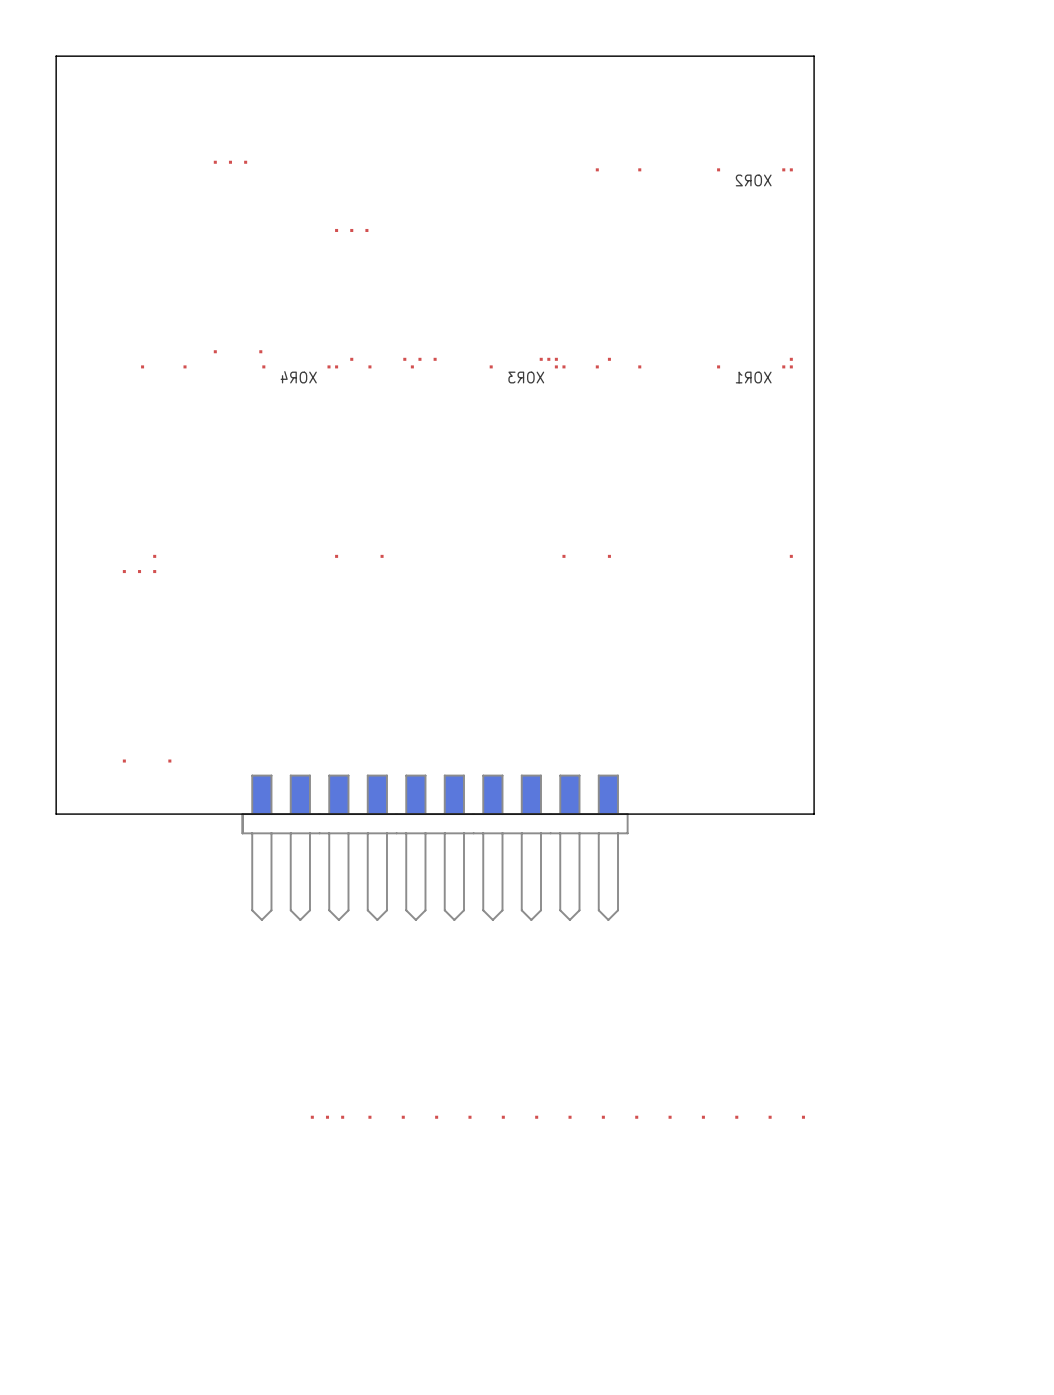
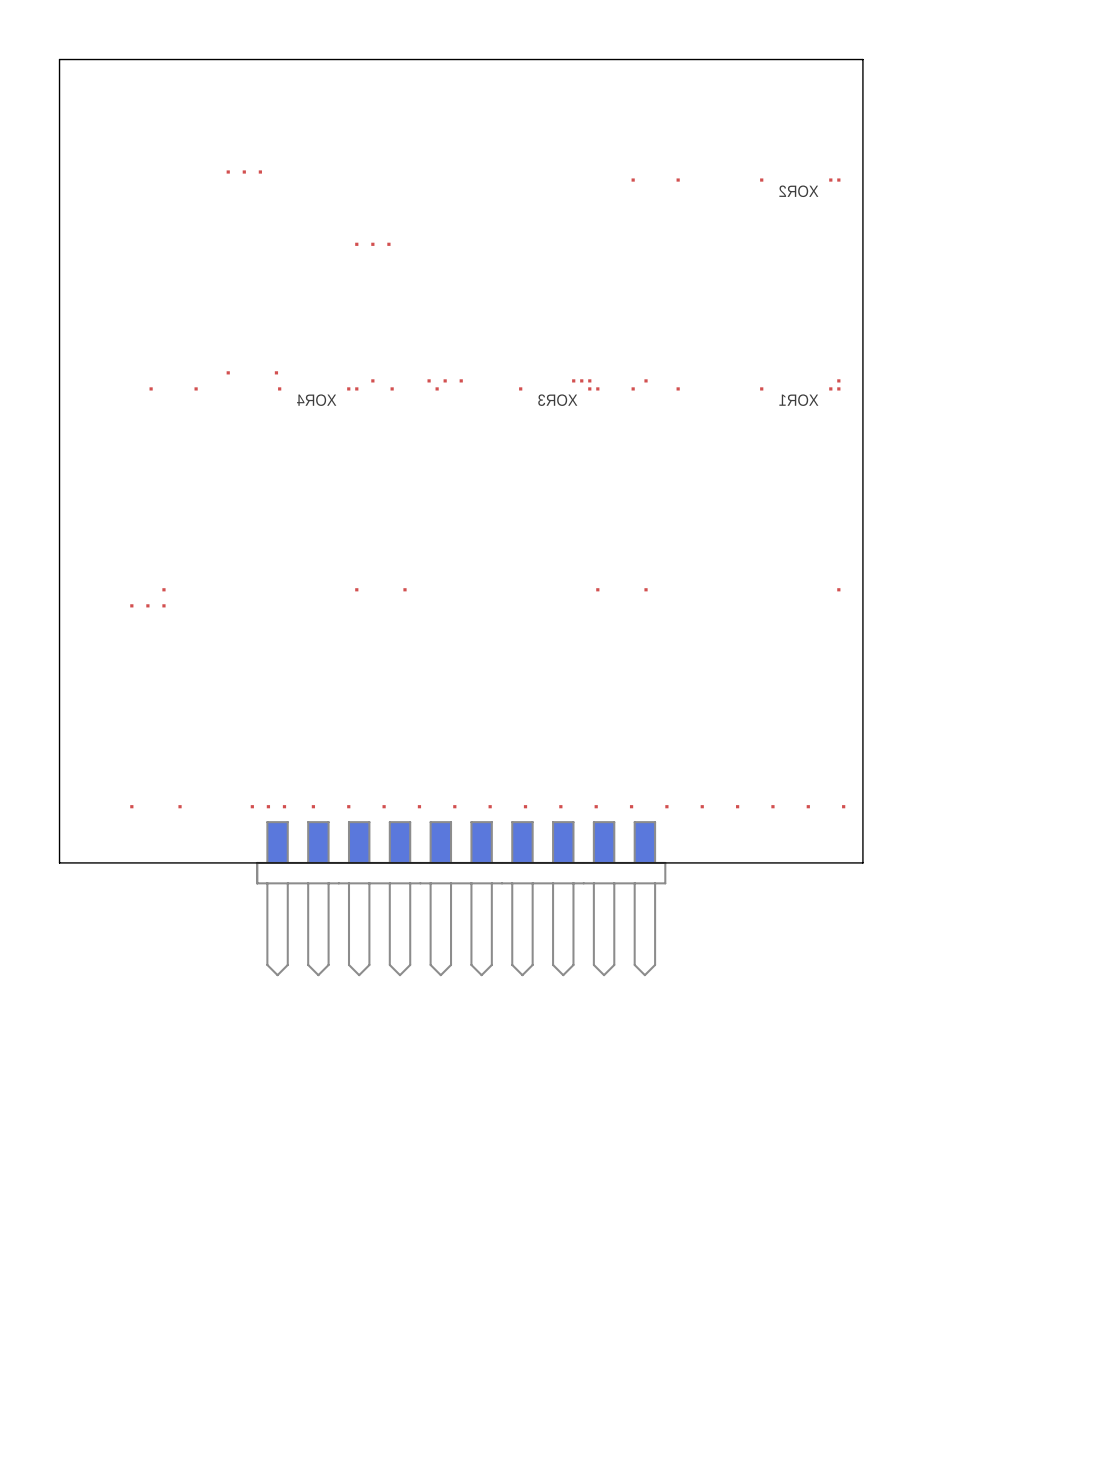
part: none -> (548, 806)
part: (557, 1117) -> none

